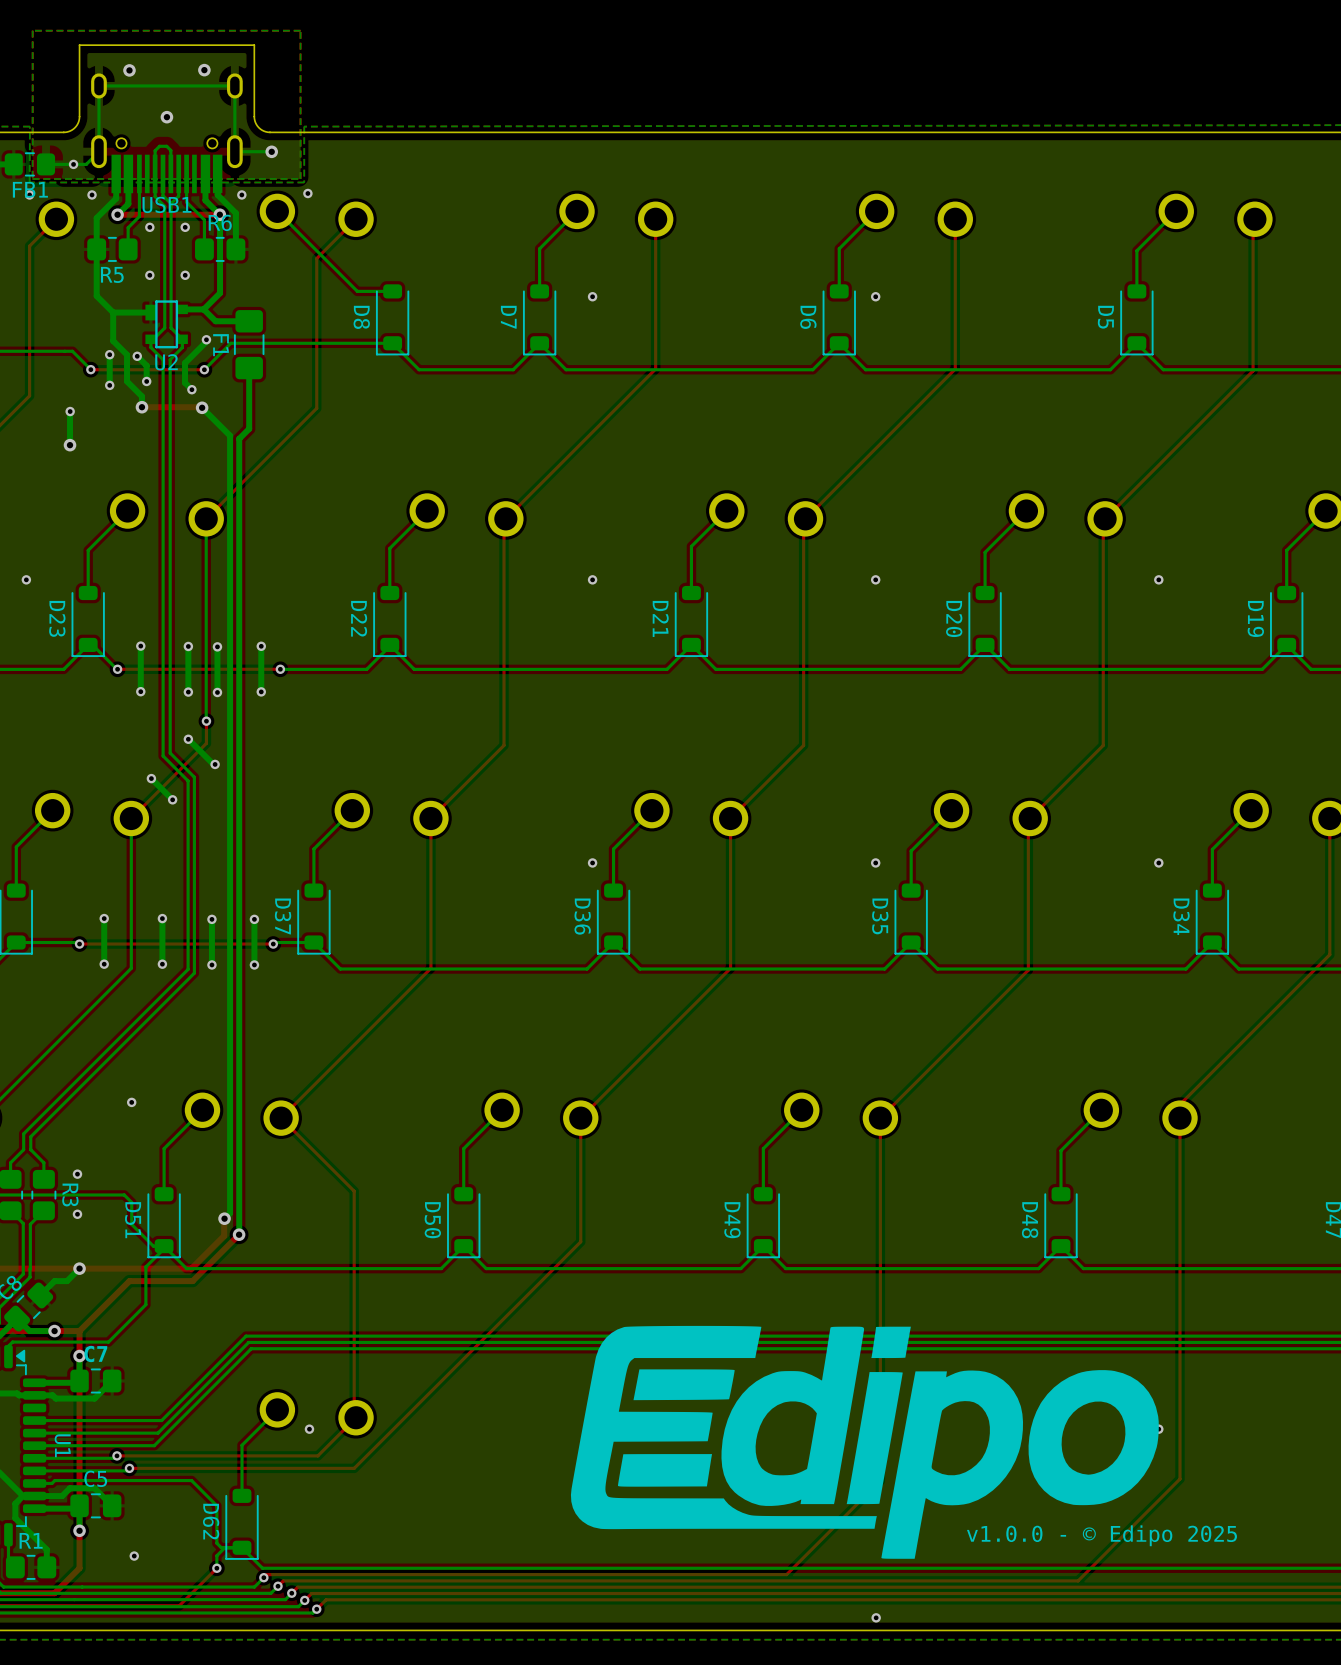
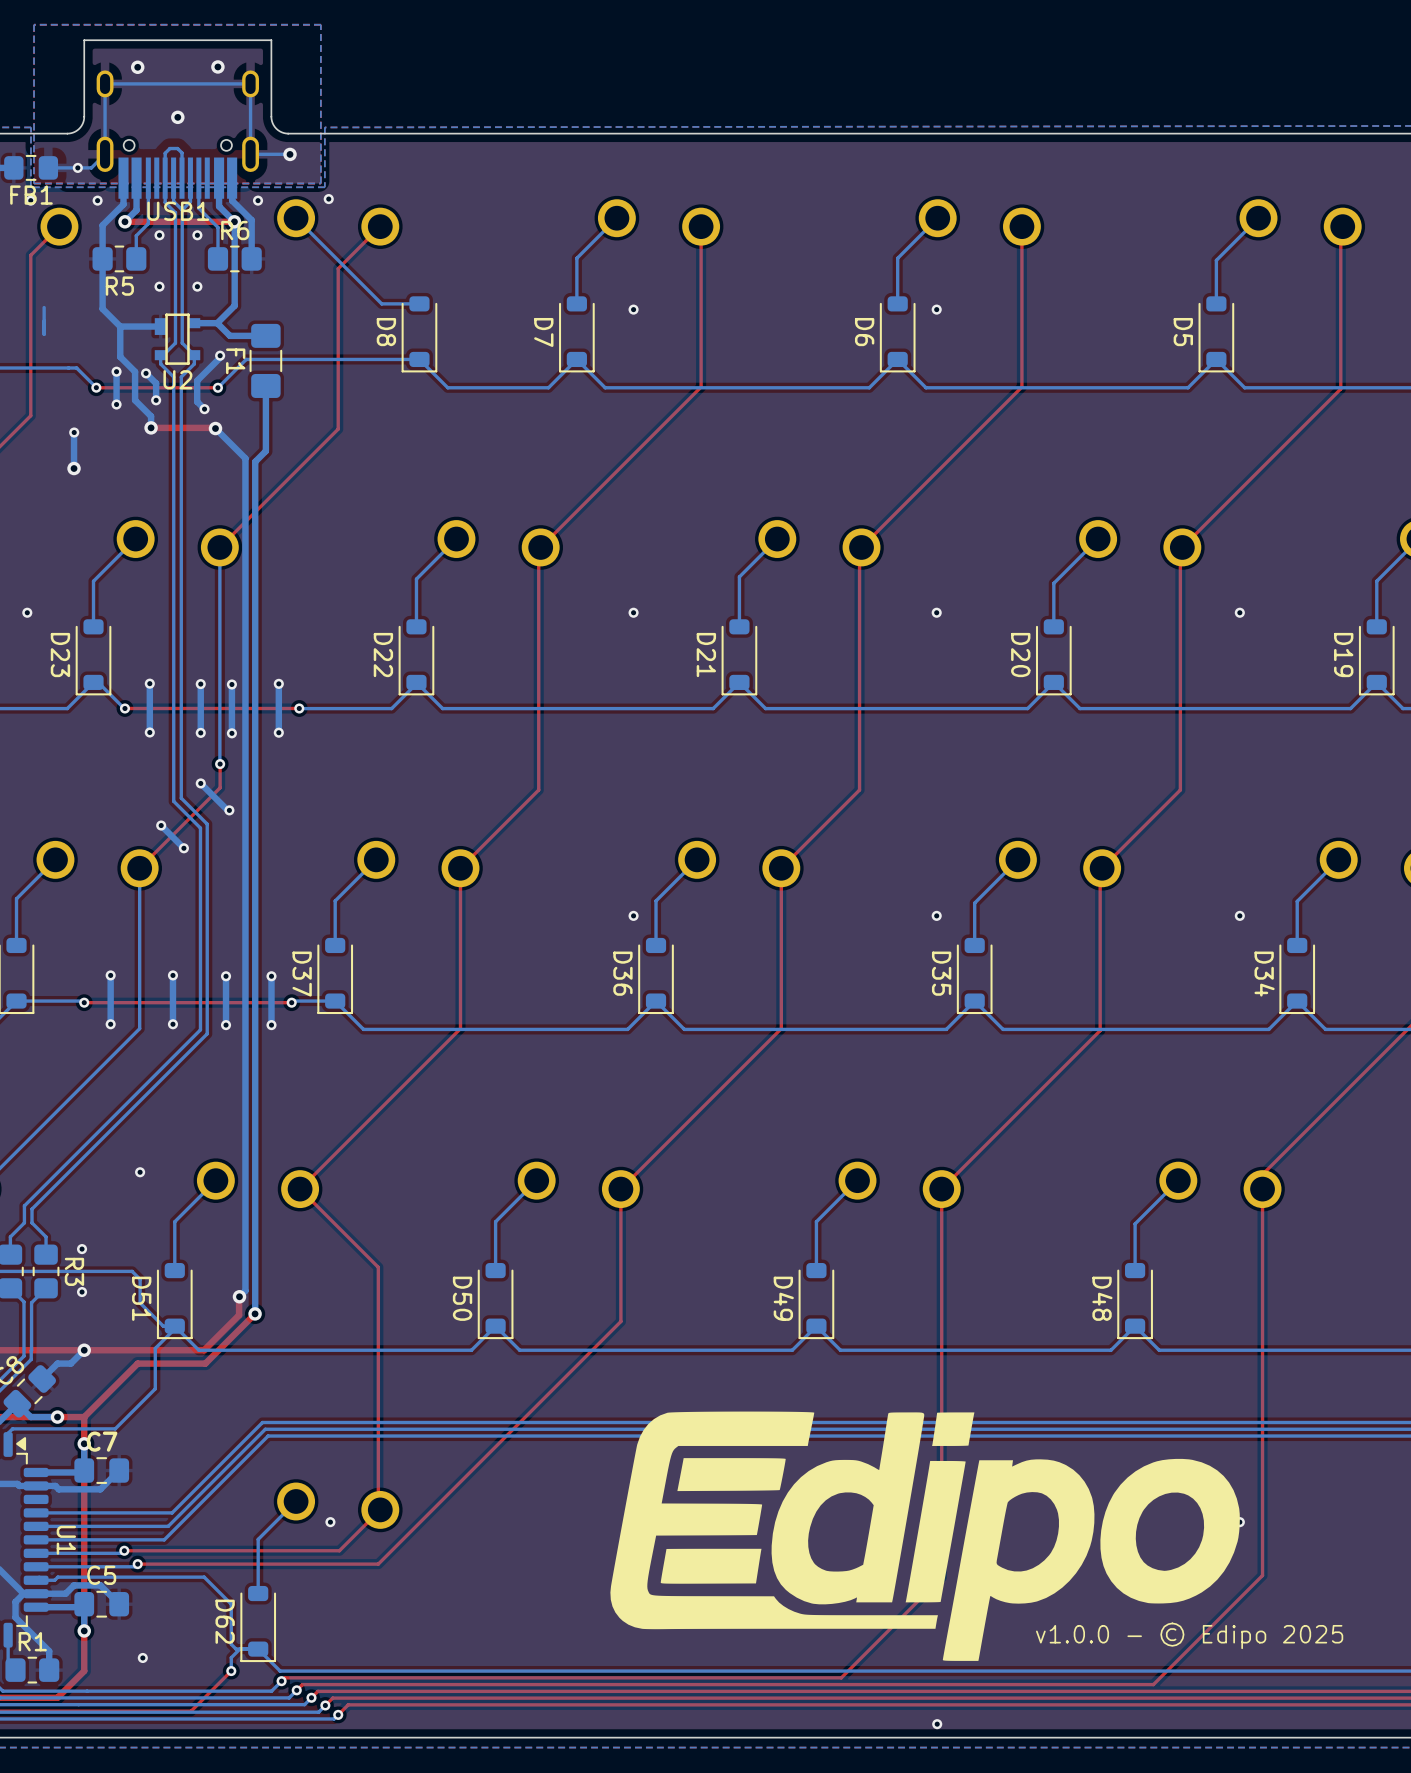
bottom track: none -> (44, 307) (44, 334)

